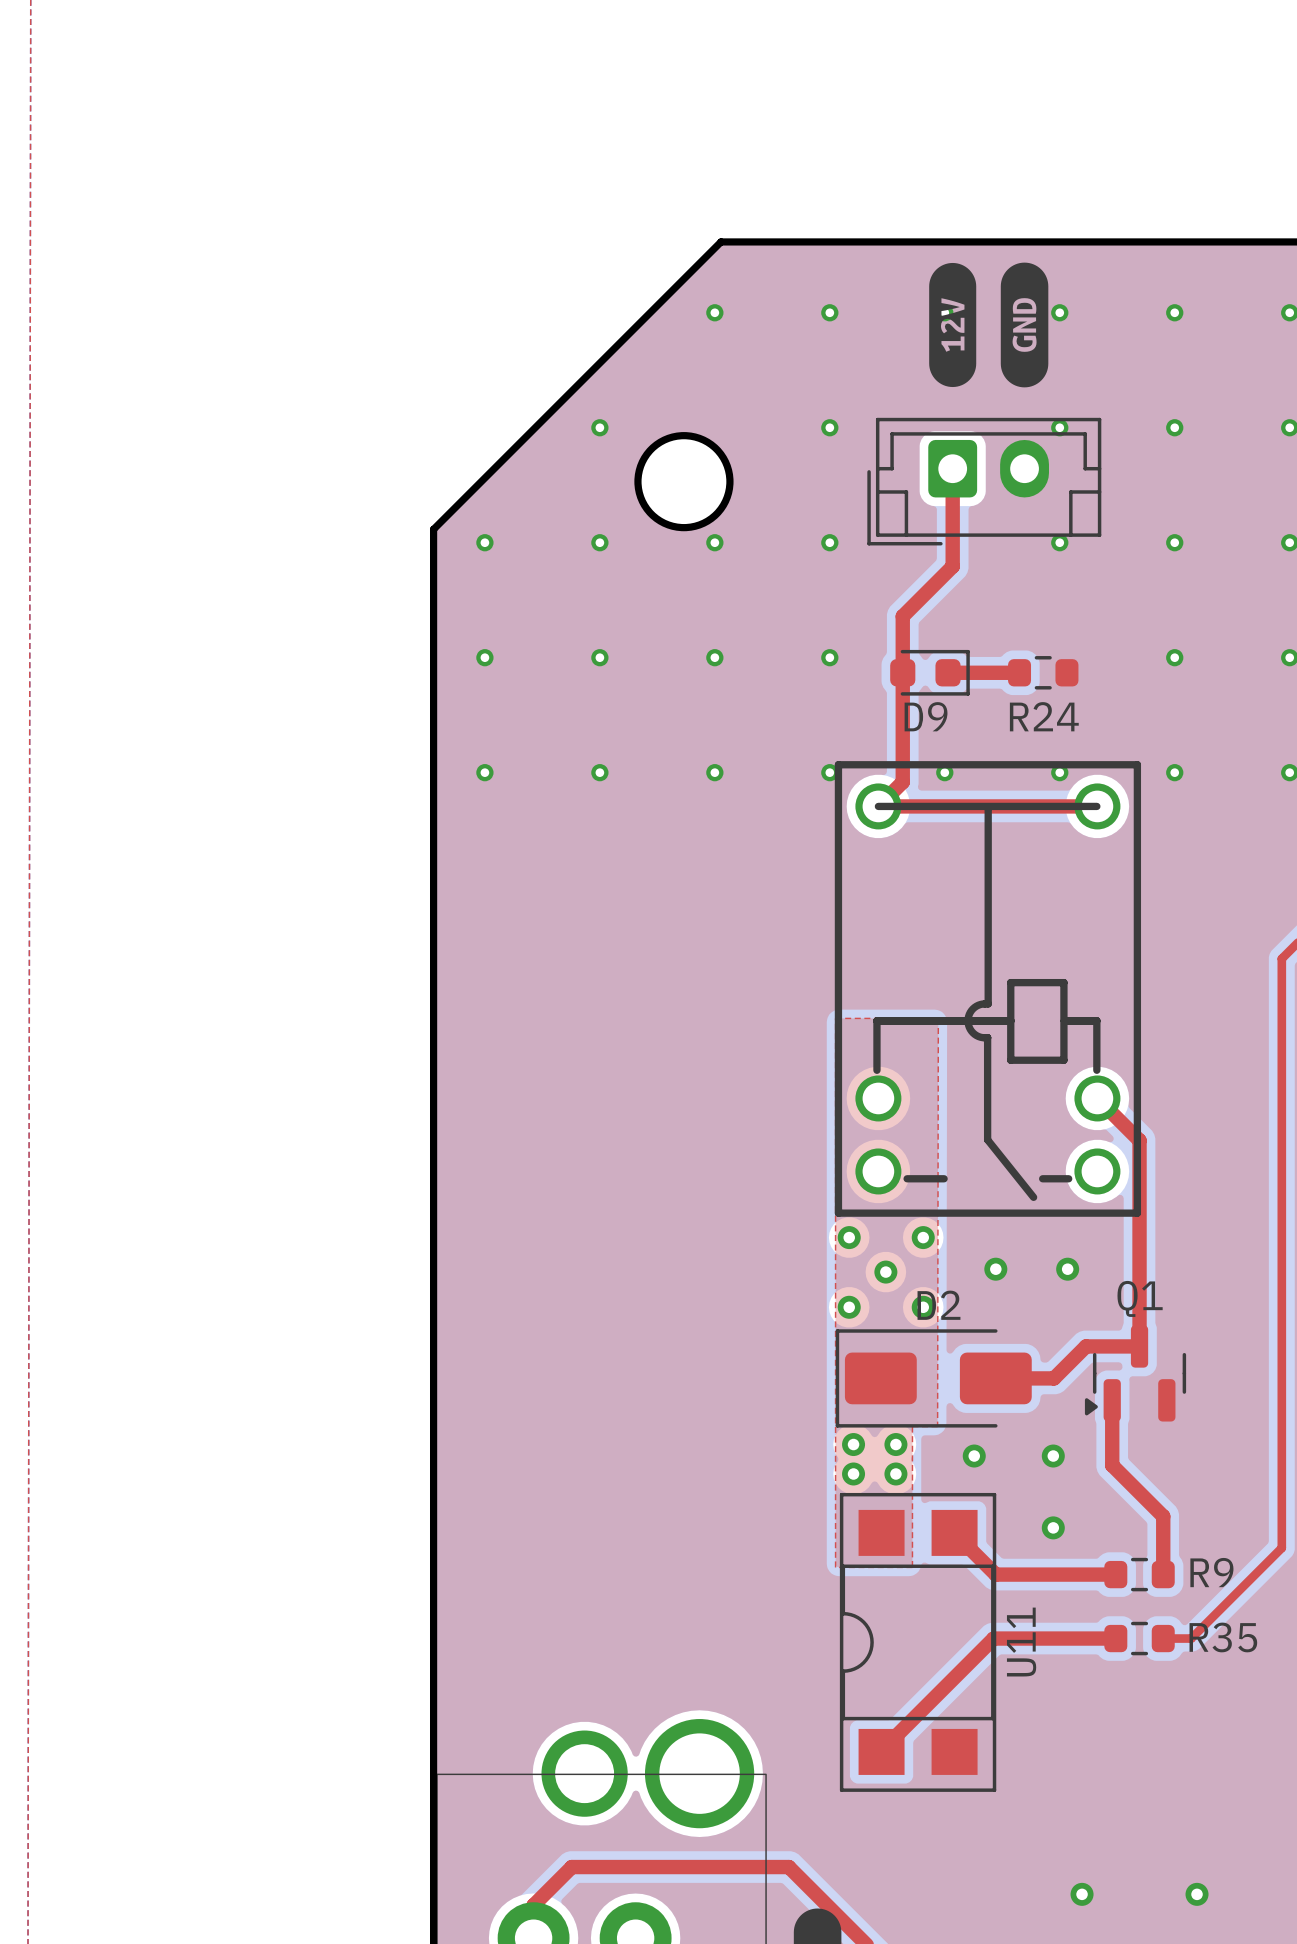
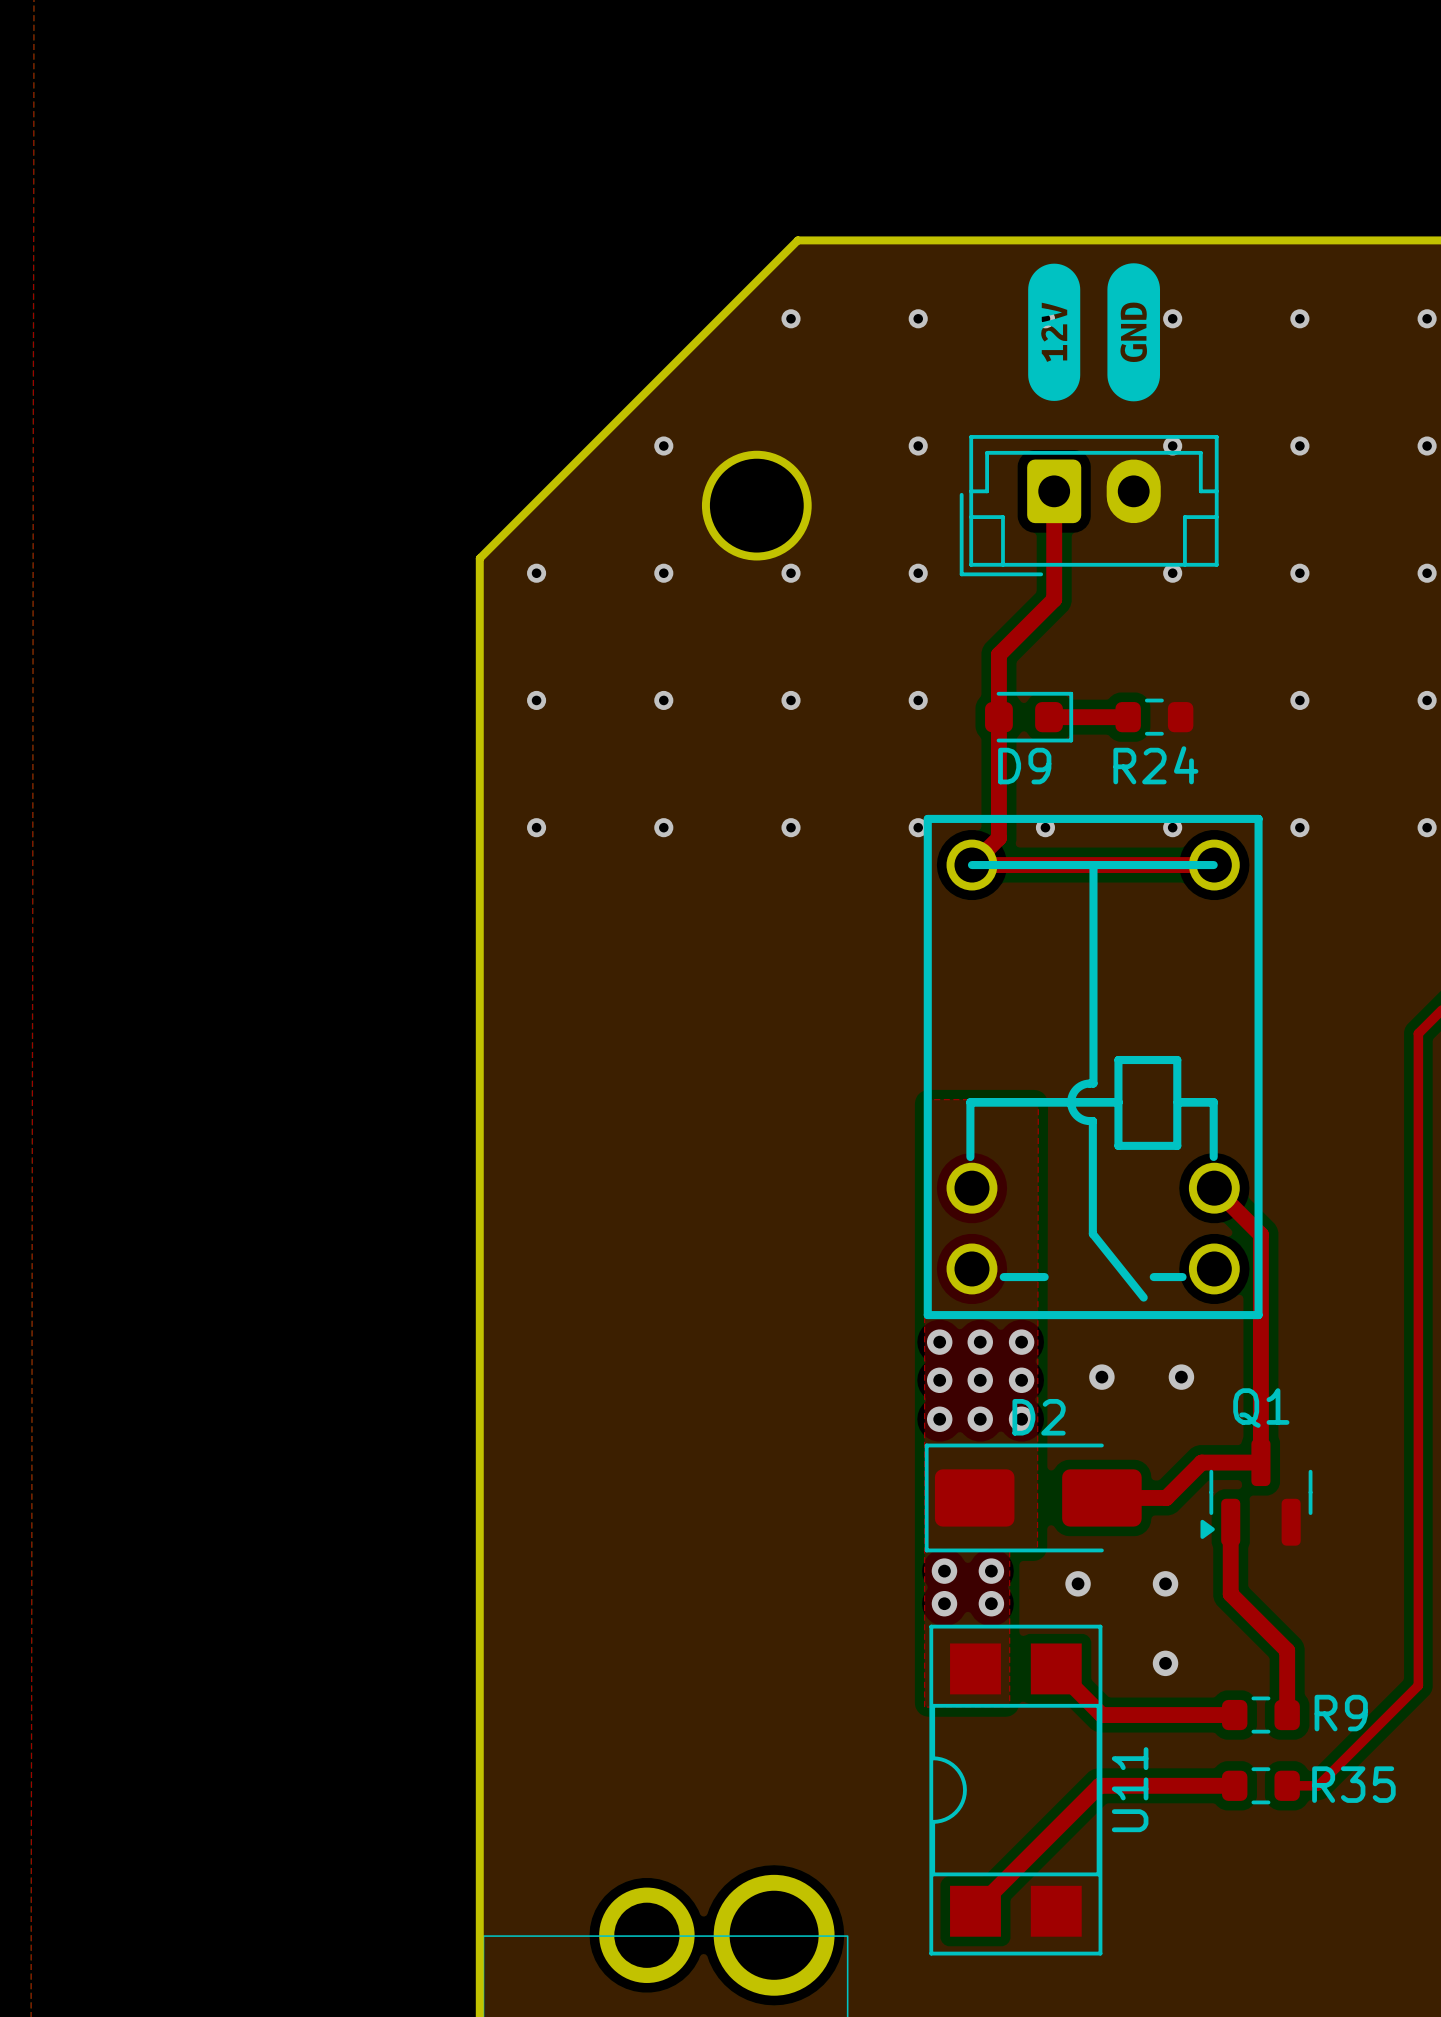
via: none -> (980, 1342)
via: none -> (939, 1380)
via: none -> (1021, 1380)
via: none -> (980, 1419)

